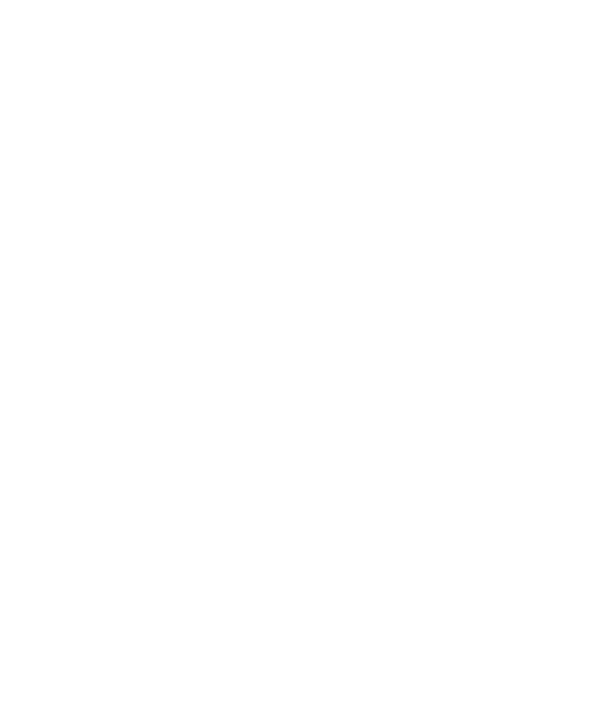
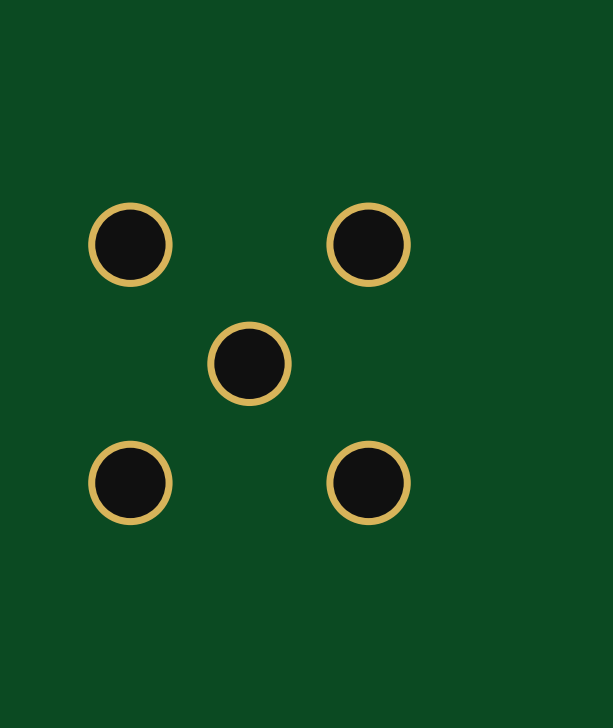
part: none -> (249, 363)

